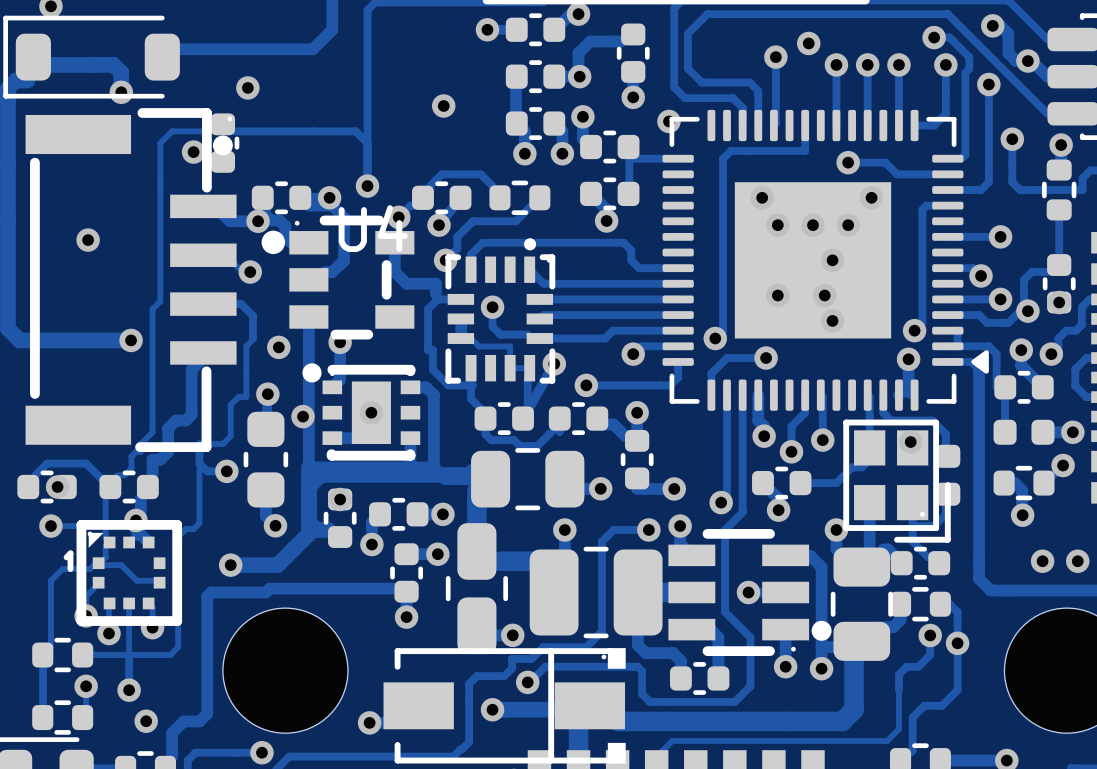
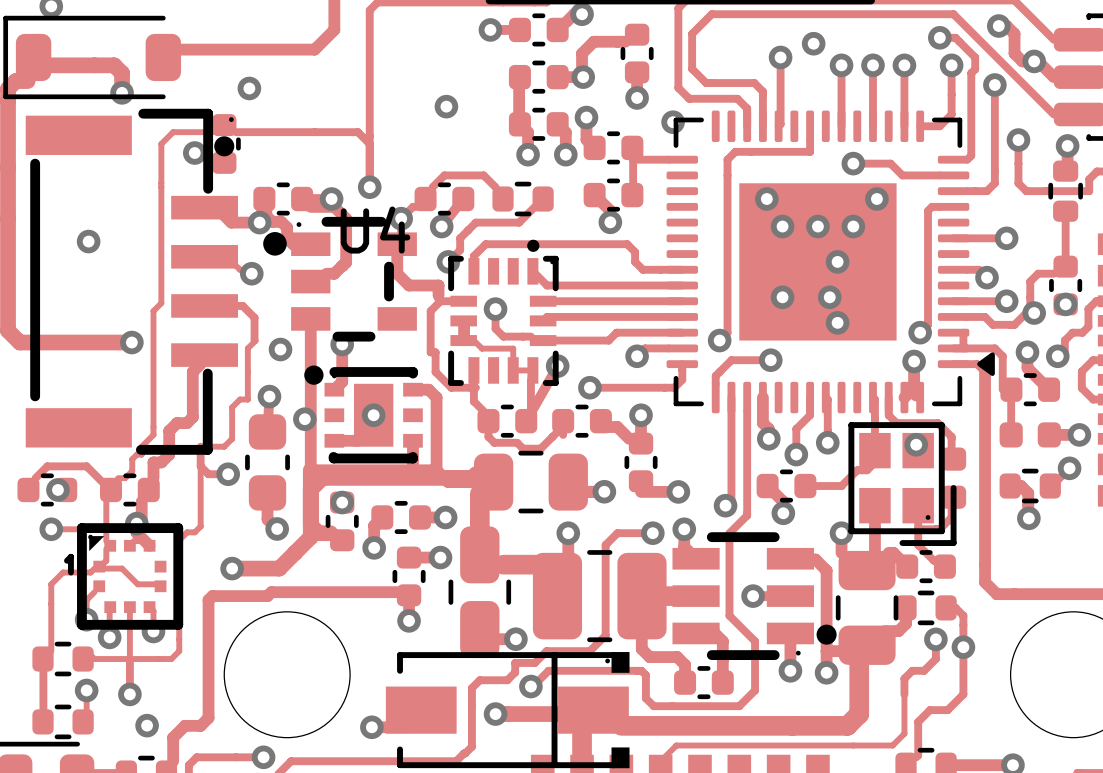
via: (1042, 561) -> none
via: (1077, 561) -> none

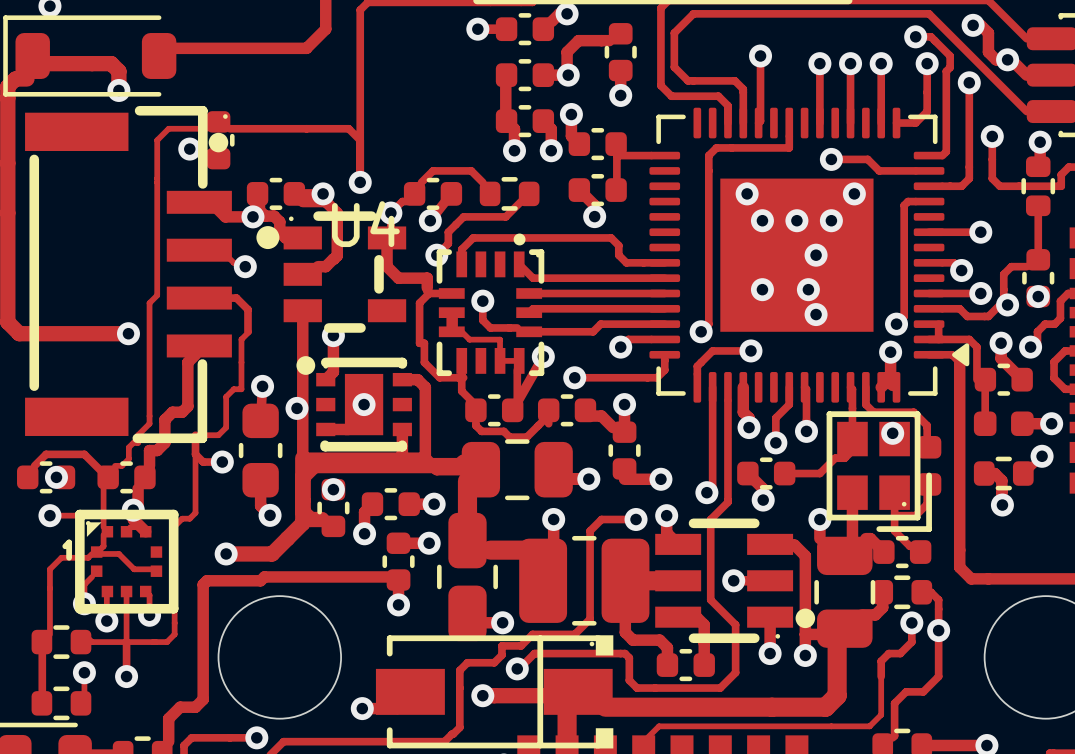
via: (813, 43) -> none
via: (249, 88) -> none
via: (446, 106) -> none
via: (673, 122) -> none
via: (88, 241) -> none
via: (280, 349) -> none
via: (147, 725) -> none

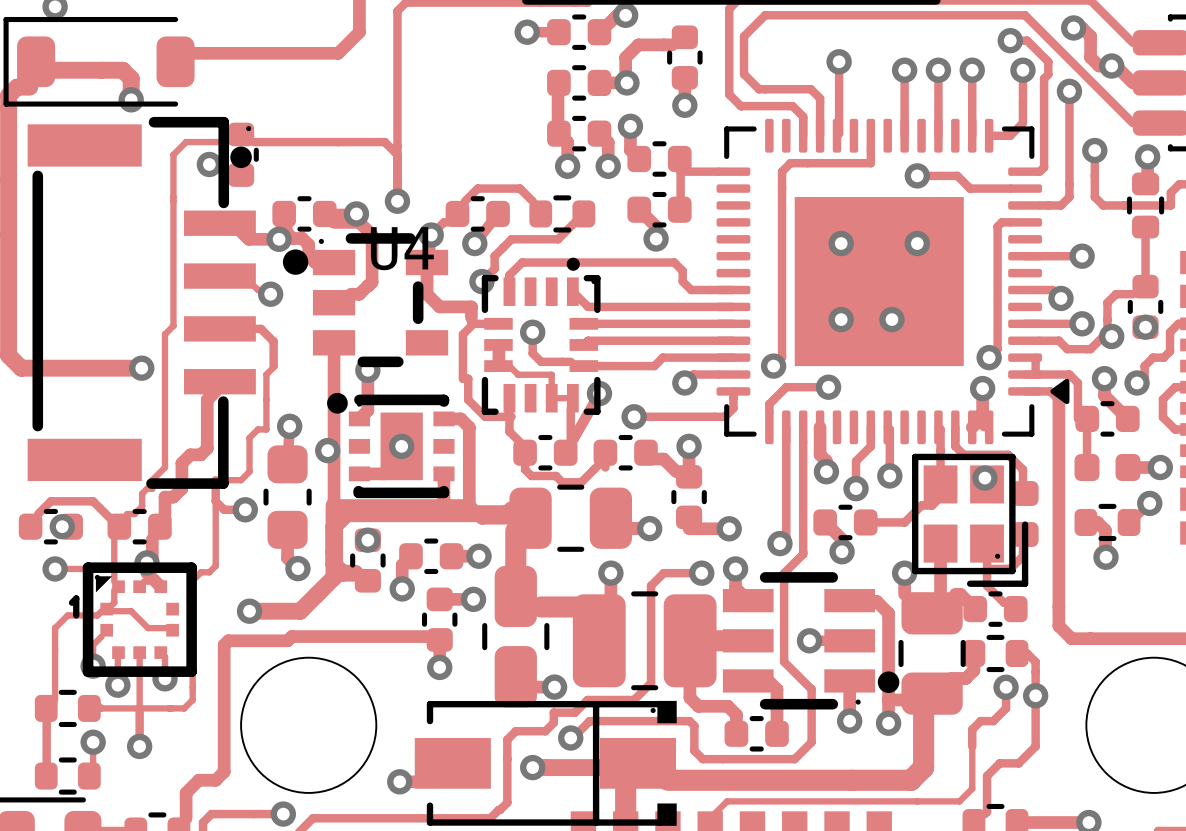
via: (747, 193) -> none
via: (854, 193) -> none
via: (796, 220) -> none
via: (816, 255) -> none
via: (816, 314) -> none

